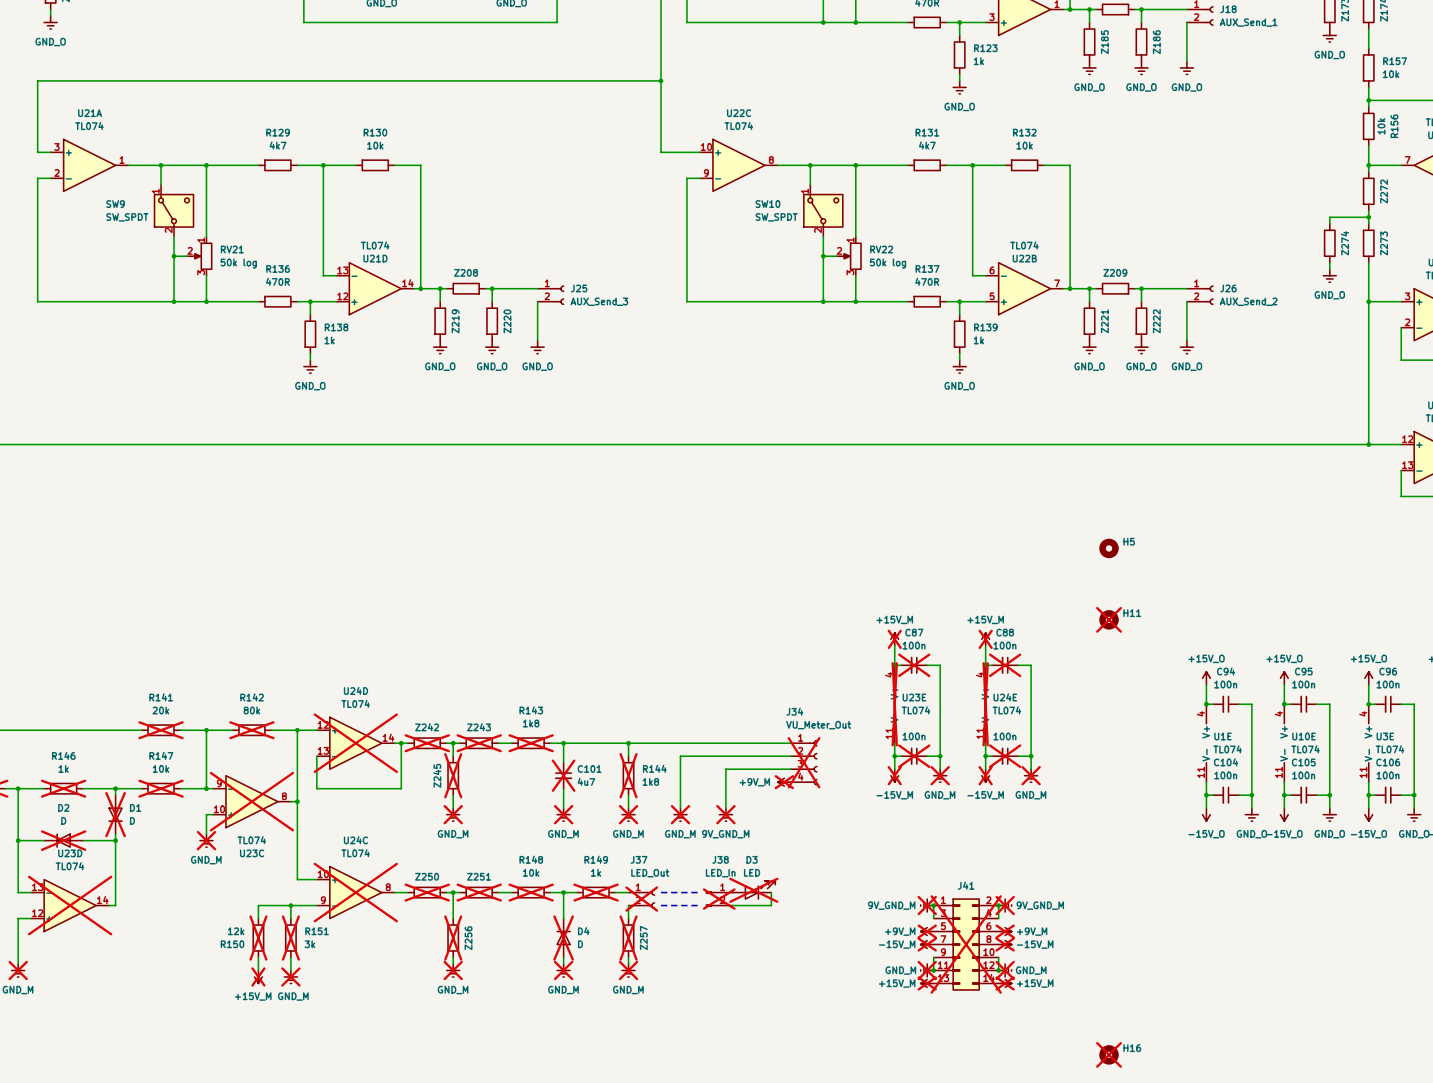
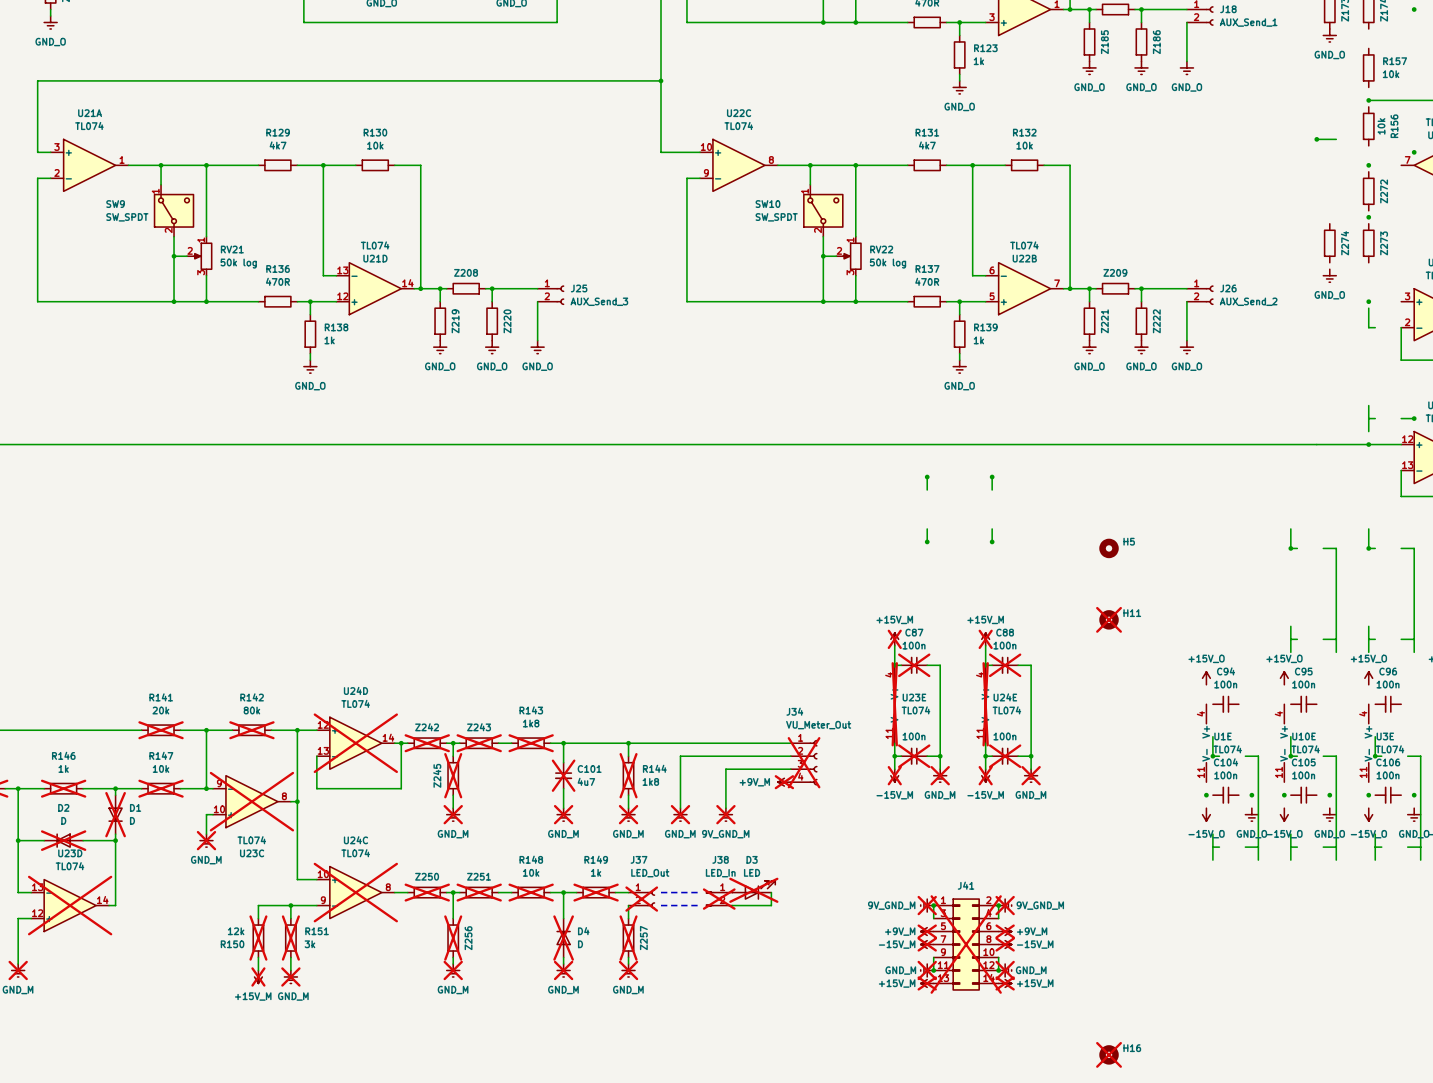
junction: none -> (1414, 9)
wire: (1368, 28) (1368, 48) -> none
wire: (1368, 87) (1368, 106) -> none
wire: none -> (1316, 139) (1336, 139)
junction: none -> (1316, 139)
wire: (1368, 145) (1368, 171) -> none
junction: none -> (1414, 152)
wire: (1368, 165) (1401, 165) -> none
wire: (1368, 210) (1368, 223) -> none
wire: (1368, 217) (1329, 217) (1329, 223) -> none
wire: (1329, 262) (1329, 269) -> none
wire: (1368, 262) (1368, 308) -> none
wire: (1368, 301) (1401, 301) -> none
wire: (1368, 327) (1368, 405) -> (1368, 327) (1375, 327)
wire: none -> (1368, 418) (1375, 418)
wire: none -> (1401, 418) (1414, 418)
junction: none -> (1414, 418)
wire: (1368, 431) (1368, 444) -> none
wire: none -> (927, 477) (927, 490)
junction: none -> (927, 477)
wire: none -> (992, 477) (992, 490)
junction: none -> (992, 477)
wire: none -> (927, 528) (927, 541)
wire: none -> (992, 528) (992, 541)
wire: none -> (1290, 528) (1290, 548) (1297, 548)
wire: none -> (1368, 528) (1368, 548) (1375, 548)
junction: none -> (927, 541)
junction: none -> (992, 541)
junction: none -> (1290, 548)
wire: none -> (1323, 548) (1336, 548) (1336, 652)
junction: none -> (1368, 548)
wire: none -> (1401, 548) (1414, 548) (1414, 652)
wire: none -> (1290, 626) (1290, 652)
wire: none -> (1368, 626) (1368, 652)
wire: none -> (1290, 639) (1297, 639)
wire: none -> (1323, 639) (1336, 639)
wire: none -> (1368, 639) (1375, 639)
wire: none -> (1401, 639) (1414, 639)
wire: (1206, 684) (1206, 704) (1212, 704) -> (1212, 736) (1212, 756) (1219, 756)
wire: (1284, 684) (1284, 704) (1290, 704) -> (1290, 736) (1290, 756) (1297, 756)
wire: (1368, 684) (1368, 704) (1375, 704) -> (1375, 736) (1375, 756) (1381, 756)
junction: (1206, 704) -> none
wire: (1238, 704) (1251, 704) (1251, 808) -> (1245, 756) (1258, 756) (1258, 860)
junction: (1284, 704) -> none
wire: (1316, 704) (1329, 704) (1329, 808) -> (1323, 756) (1336, 756) (1336, 860)
junction: (1368, 704) -> none
wire: (1401, 704) (1414, 704) (1414, 808) -> (1407, 756) (1420, 756) (1420, 860)
junction: none -> (1212, 756)
junction: none -> (1290, 756)
junction: none -> (1375, 756)
wire: (1206, 782) (1206, 808) -> (1212, 834) (1212, 860)
wire: (1284, 782) (1284, 808) -> (1290, 834) (1290, 860)
wire: (1368, 782) (1368, 808) -> (1375, 834) (1375, 860)
wire: (1206, 795) (1212, 795) -> (1212, 847) (1219, 847)
wire: (1238, 795) (1251, 795) -> (1245, 847) (1258, 847)
wire: (1284, 795) (1290, 795) -> (1290, 847) (1297, 847)
wire: (1316, 795) (1329, 795) -> (1323, 847) (1336, 847)
wire: (1368, 795) (1375, 795) -> (1375, 847) (1381, 847)
wire: (1401, 795) (1414, 795) -> (1407, 847) (1420, 847)

